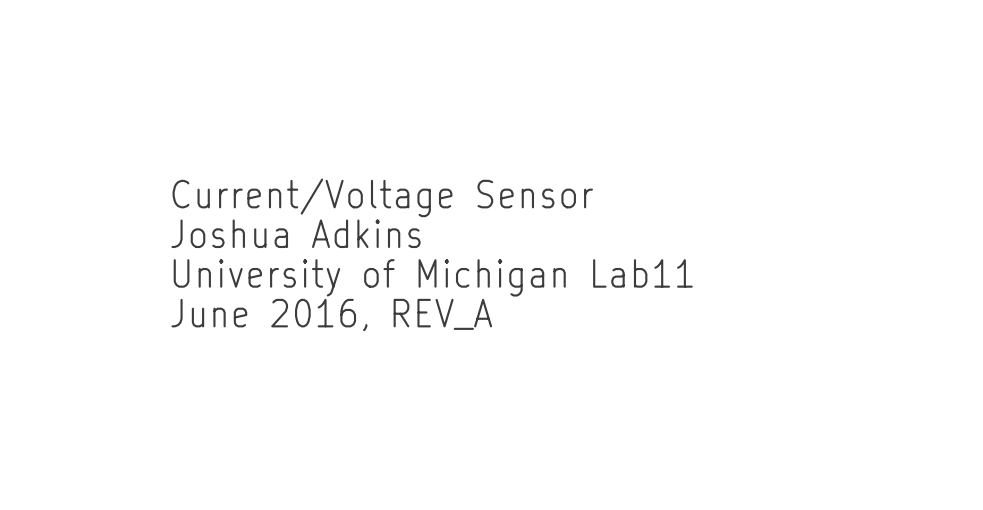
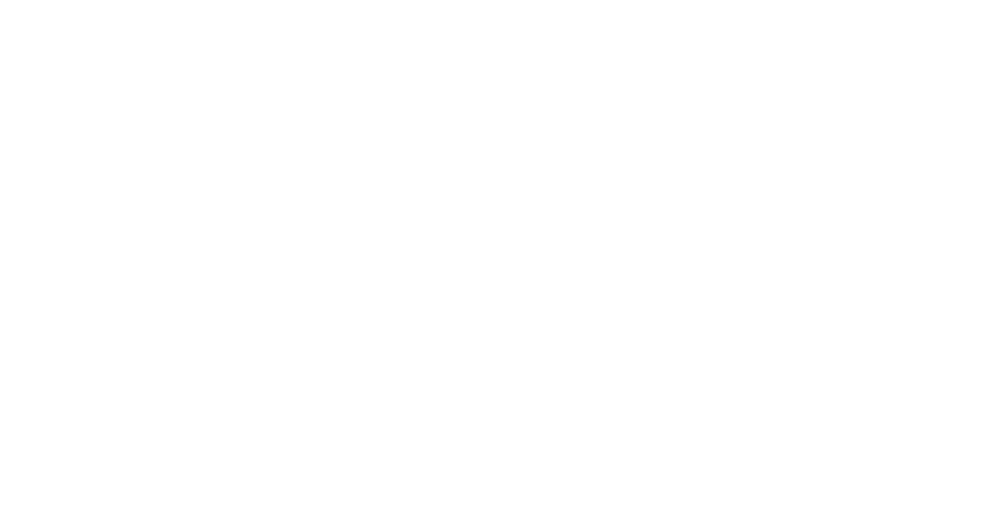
text: Current/Voltage Sensor (382, 197) -> none
text: Joshua Adkins (296, 233) -> none
text: University of Michigan Lab11 (433, 277) -> none
text: June 2016, REV_A (331, 315) -> none

